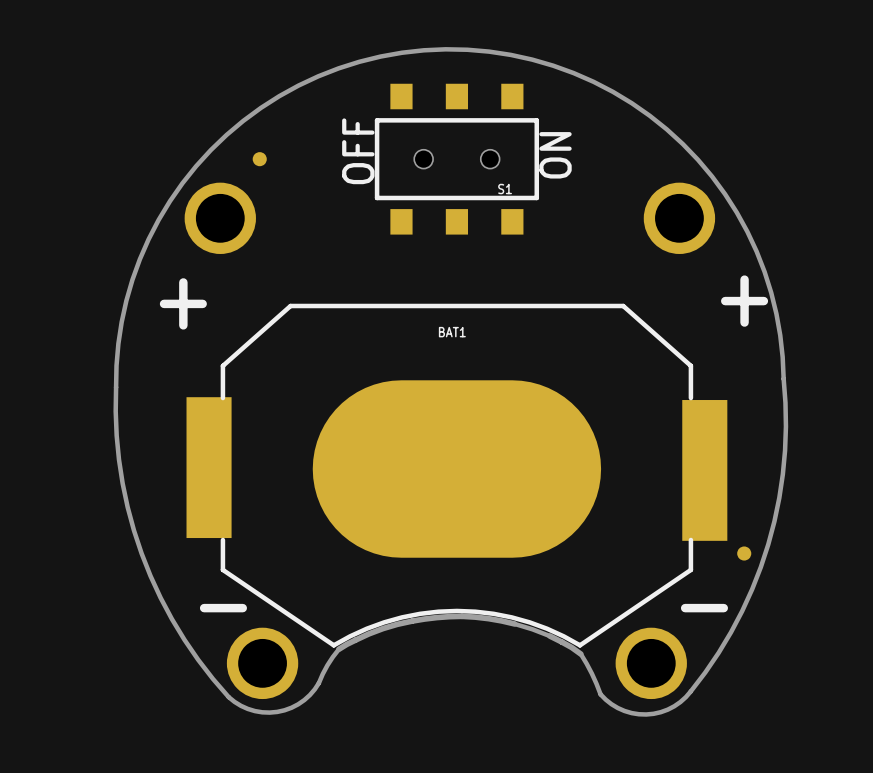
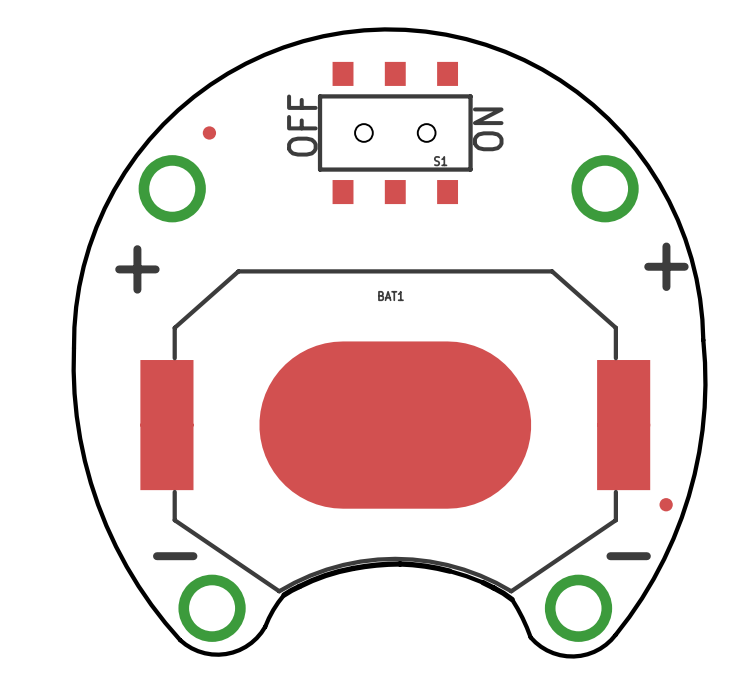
BAT1 footprint: [186, 303, 728, 648] -> [140, 269, 651, 594]

